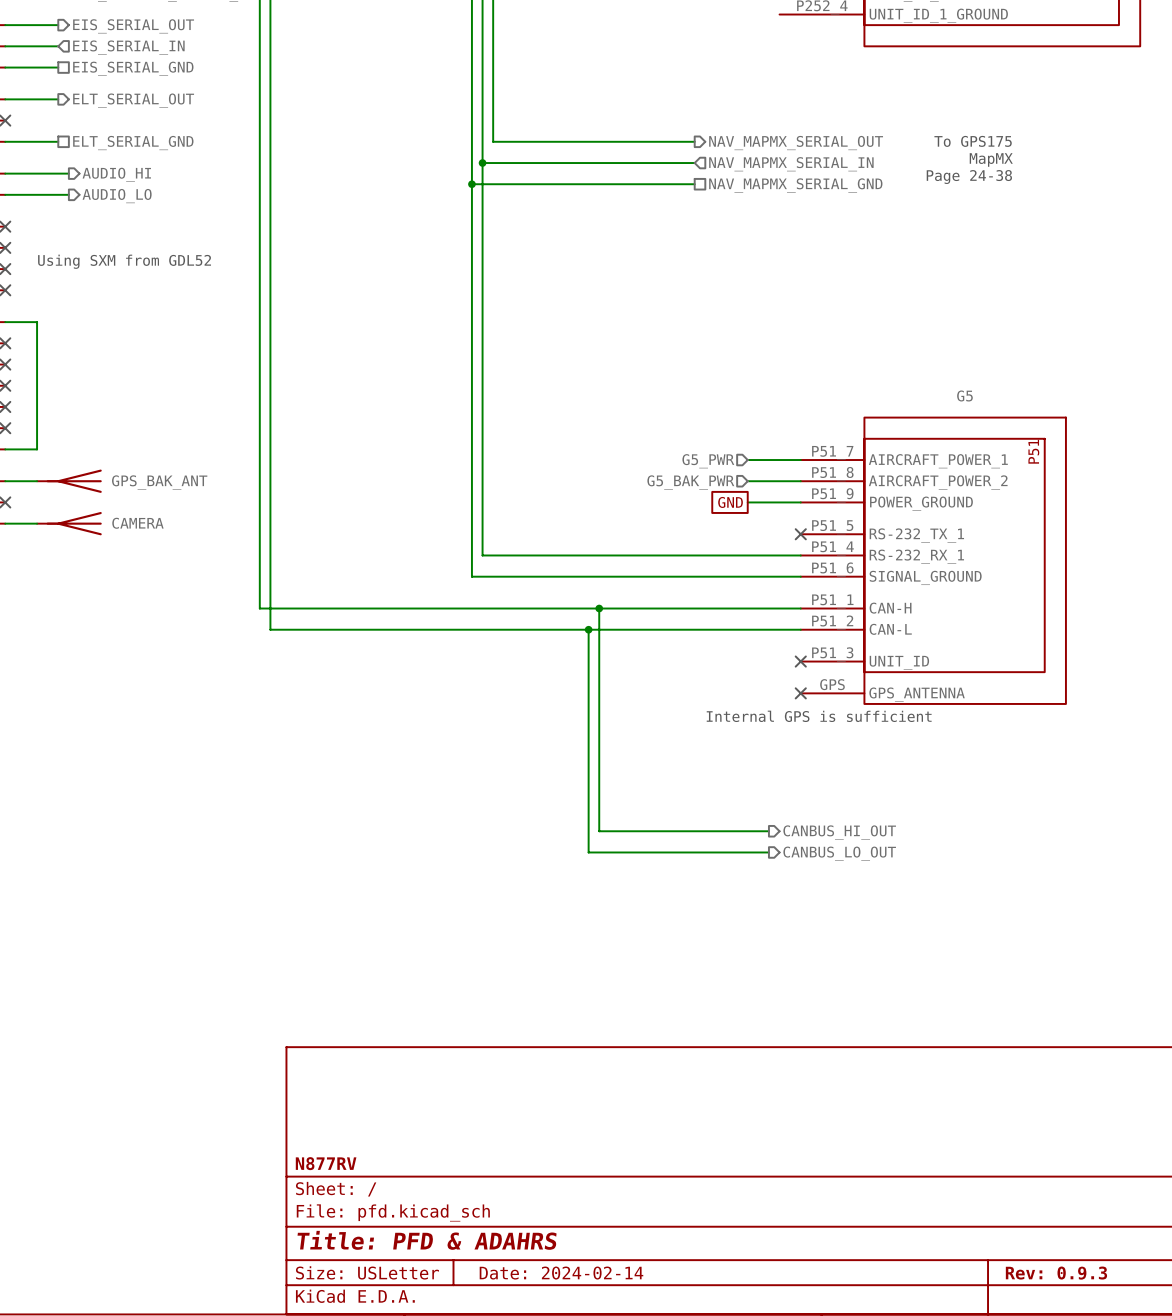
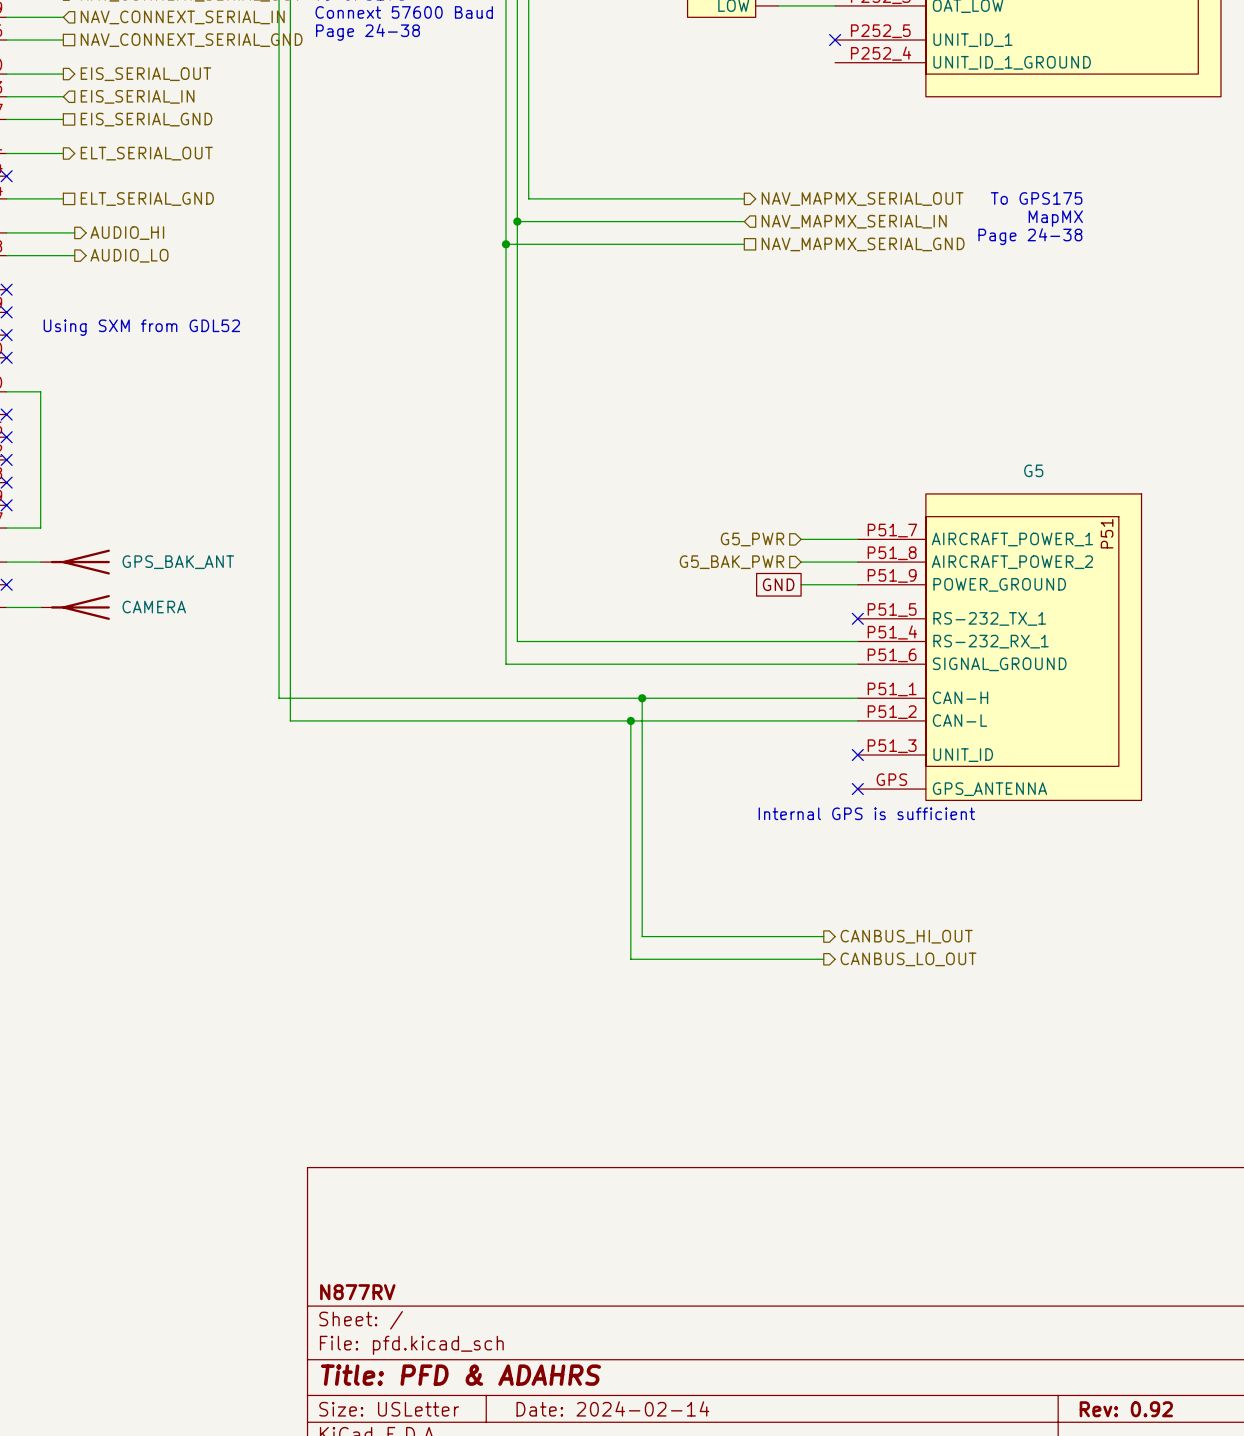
title block: Rev: 0.9.3 (1056, 1273) -> Rev: 0.92 (1126, 1409)

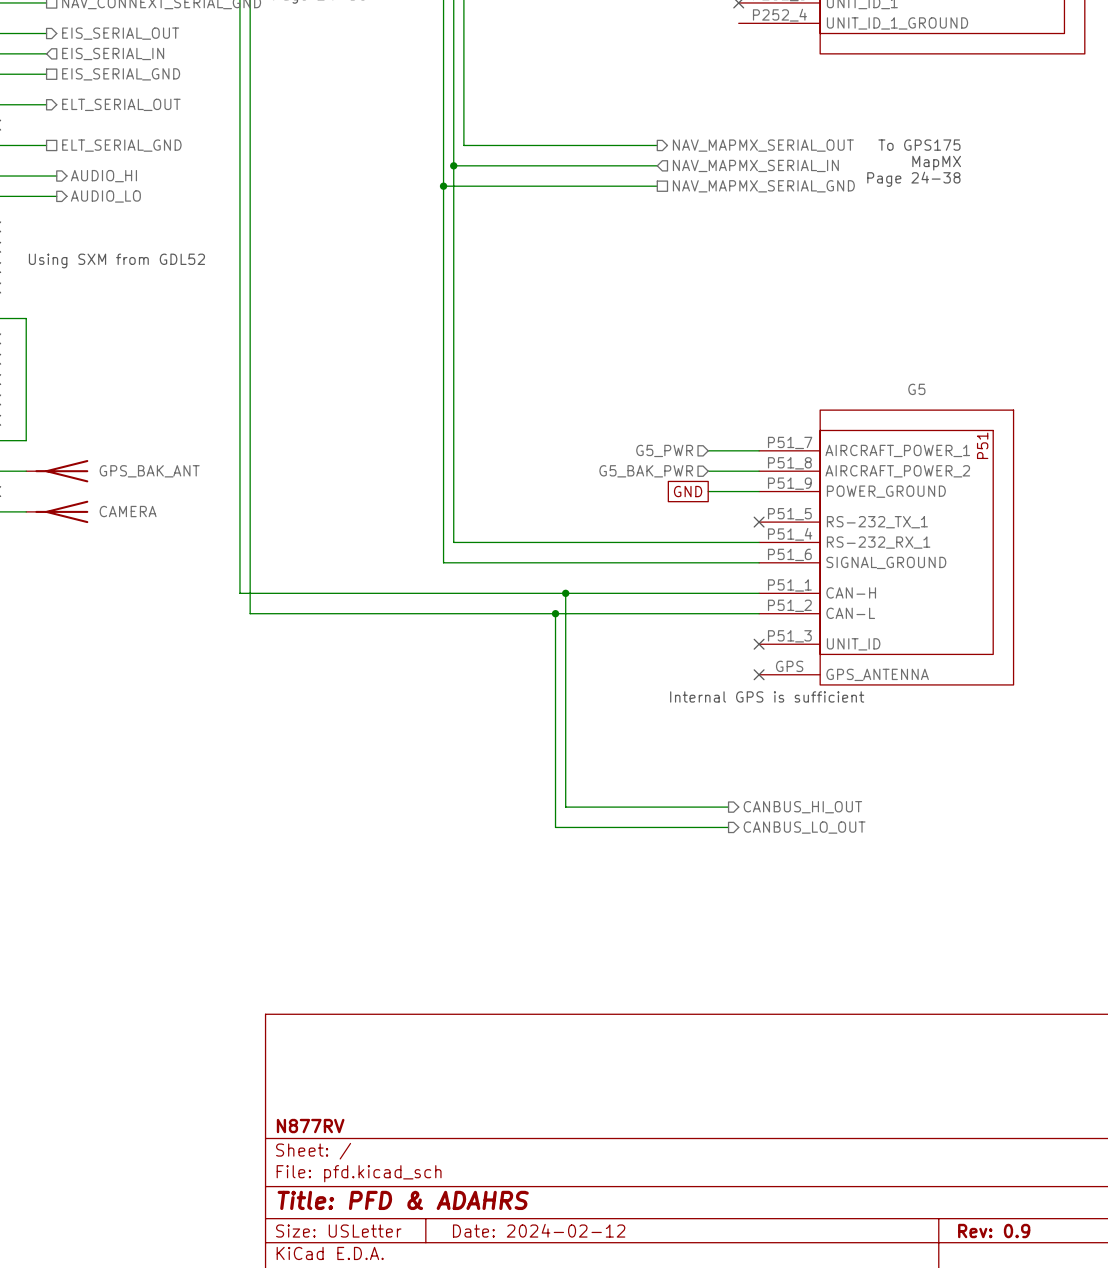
title block: Date: 2024-02-14 (612, 1408) -> Date: 2024-02-12 (539, 1230)
title block: Rev: 0.92 (1126, 1409) -> Rev: 0.9 (994, 1231)

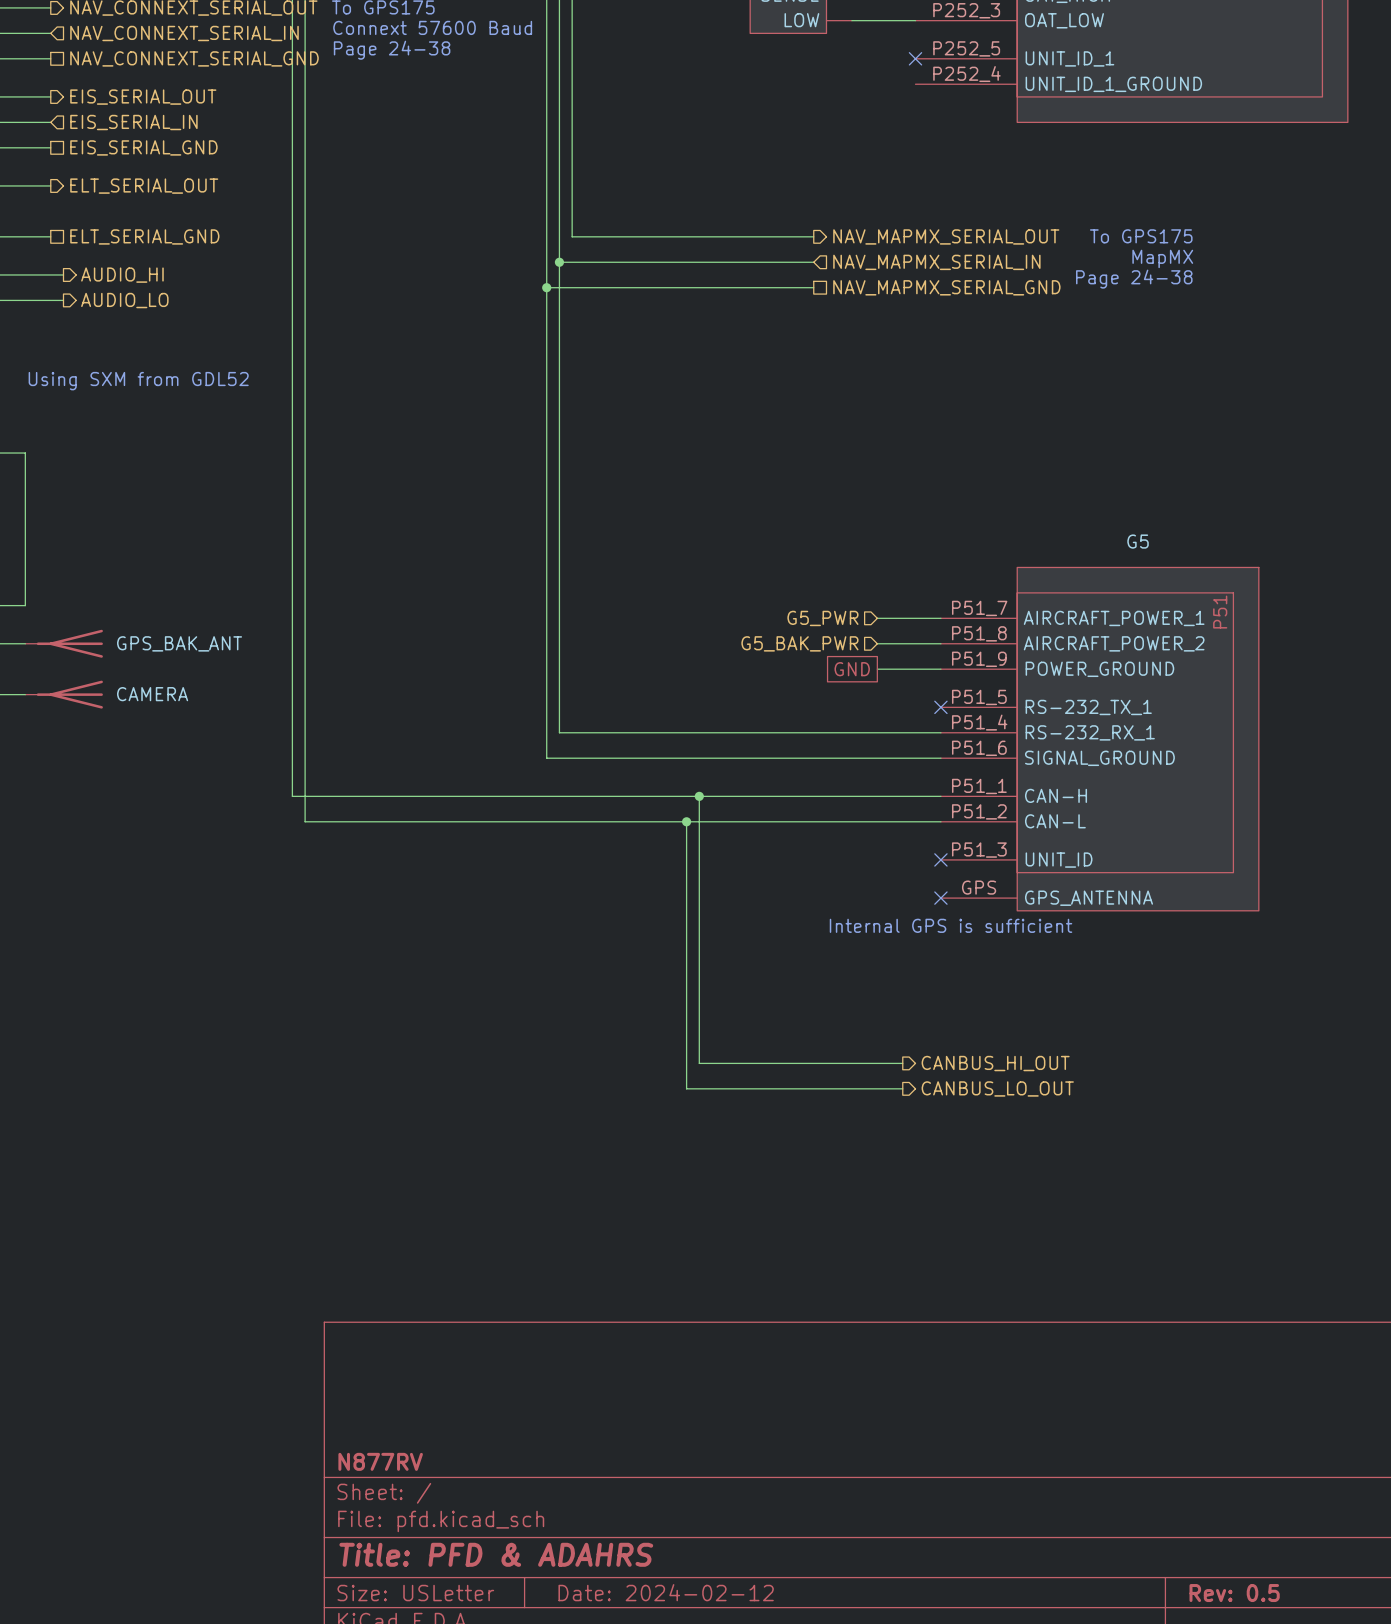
title block: Rev: 0.9 (994, 1231) -> Rev: 0.5 (1234, 1593)

